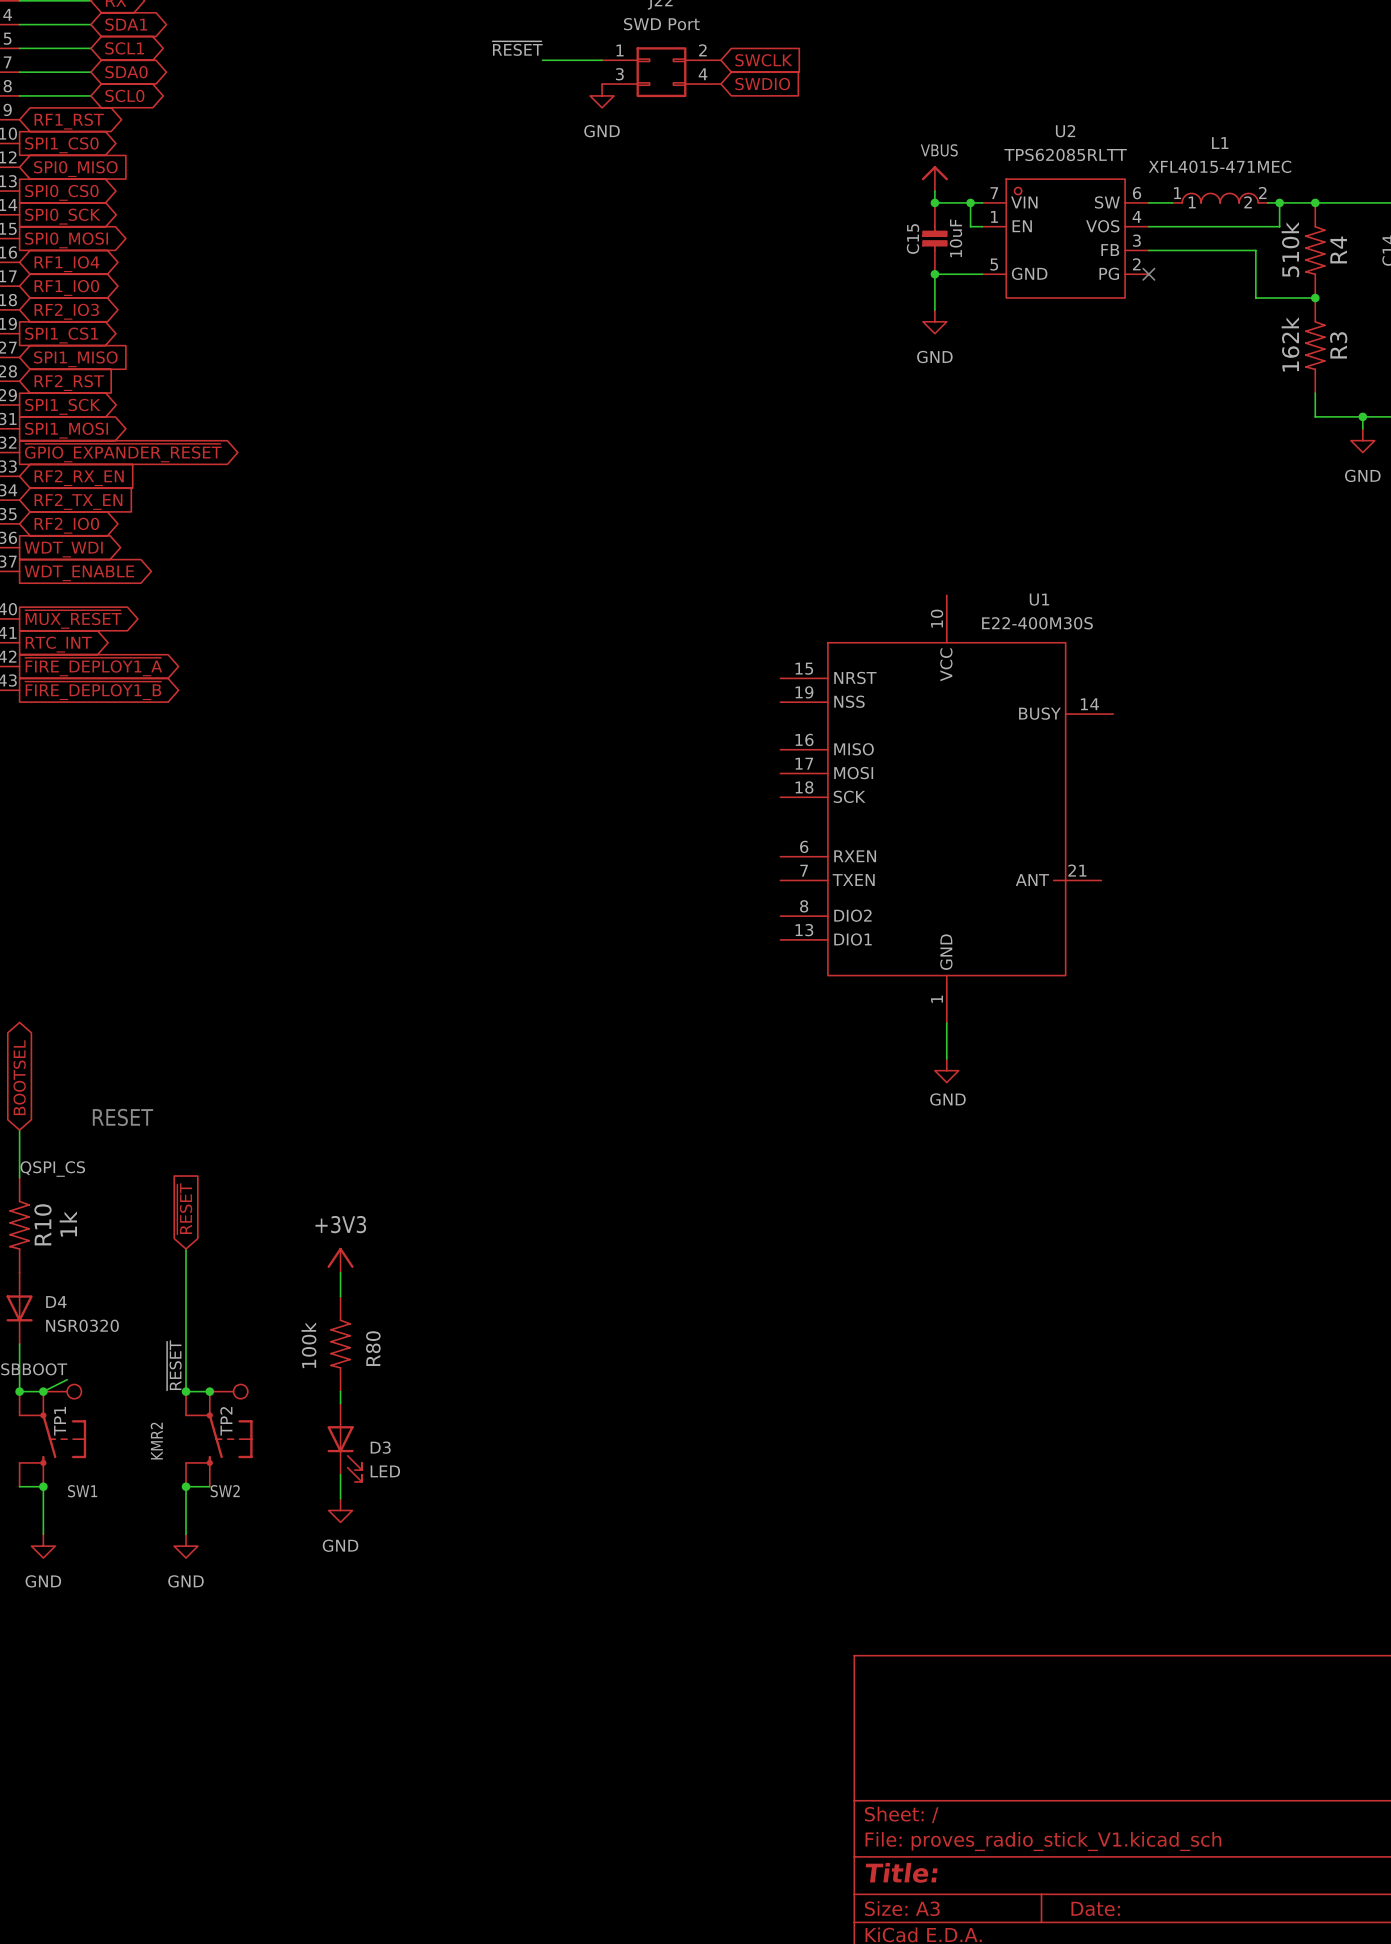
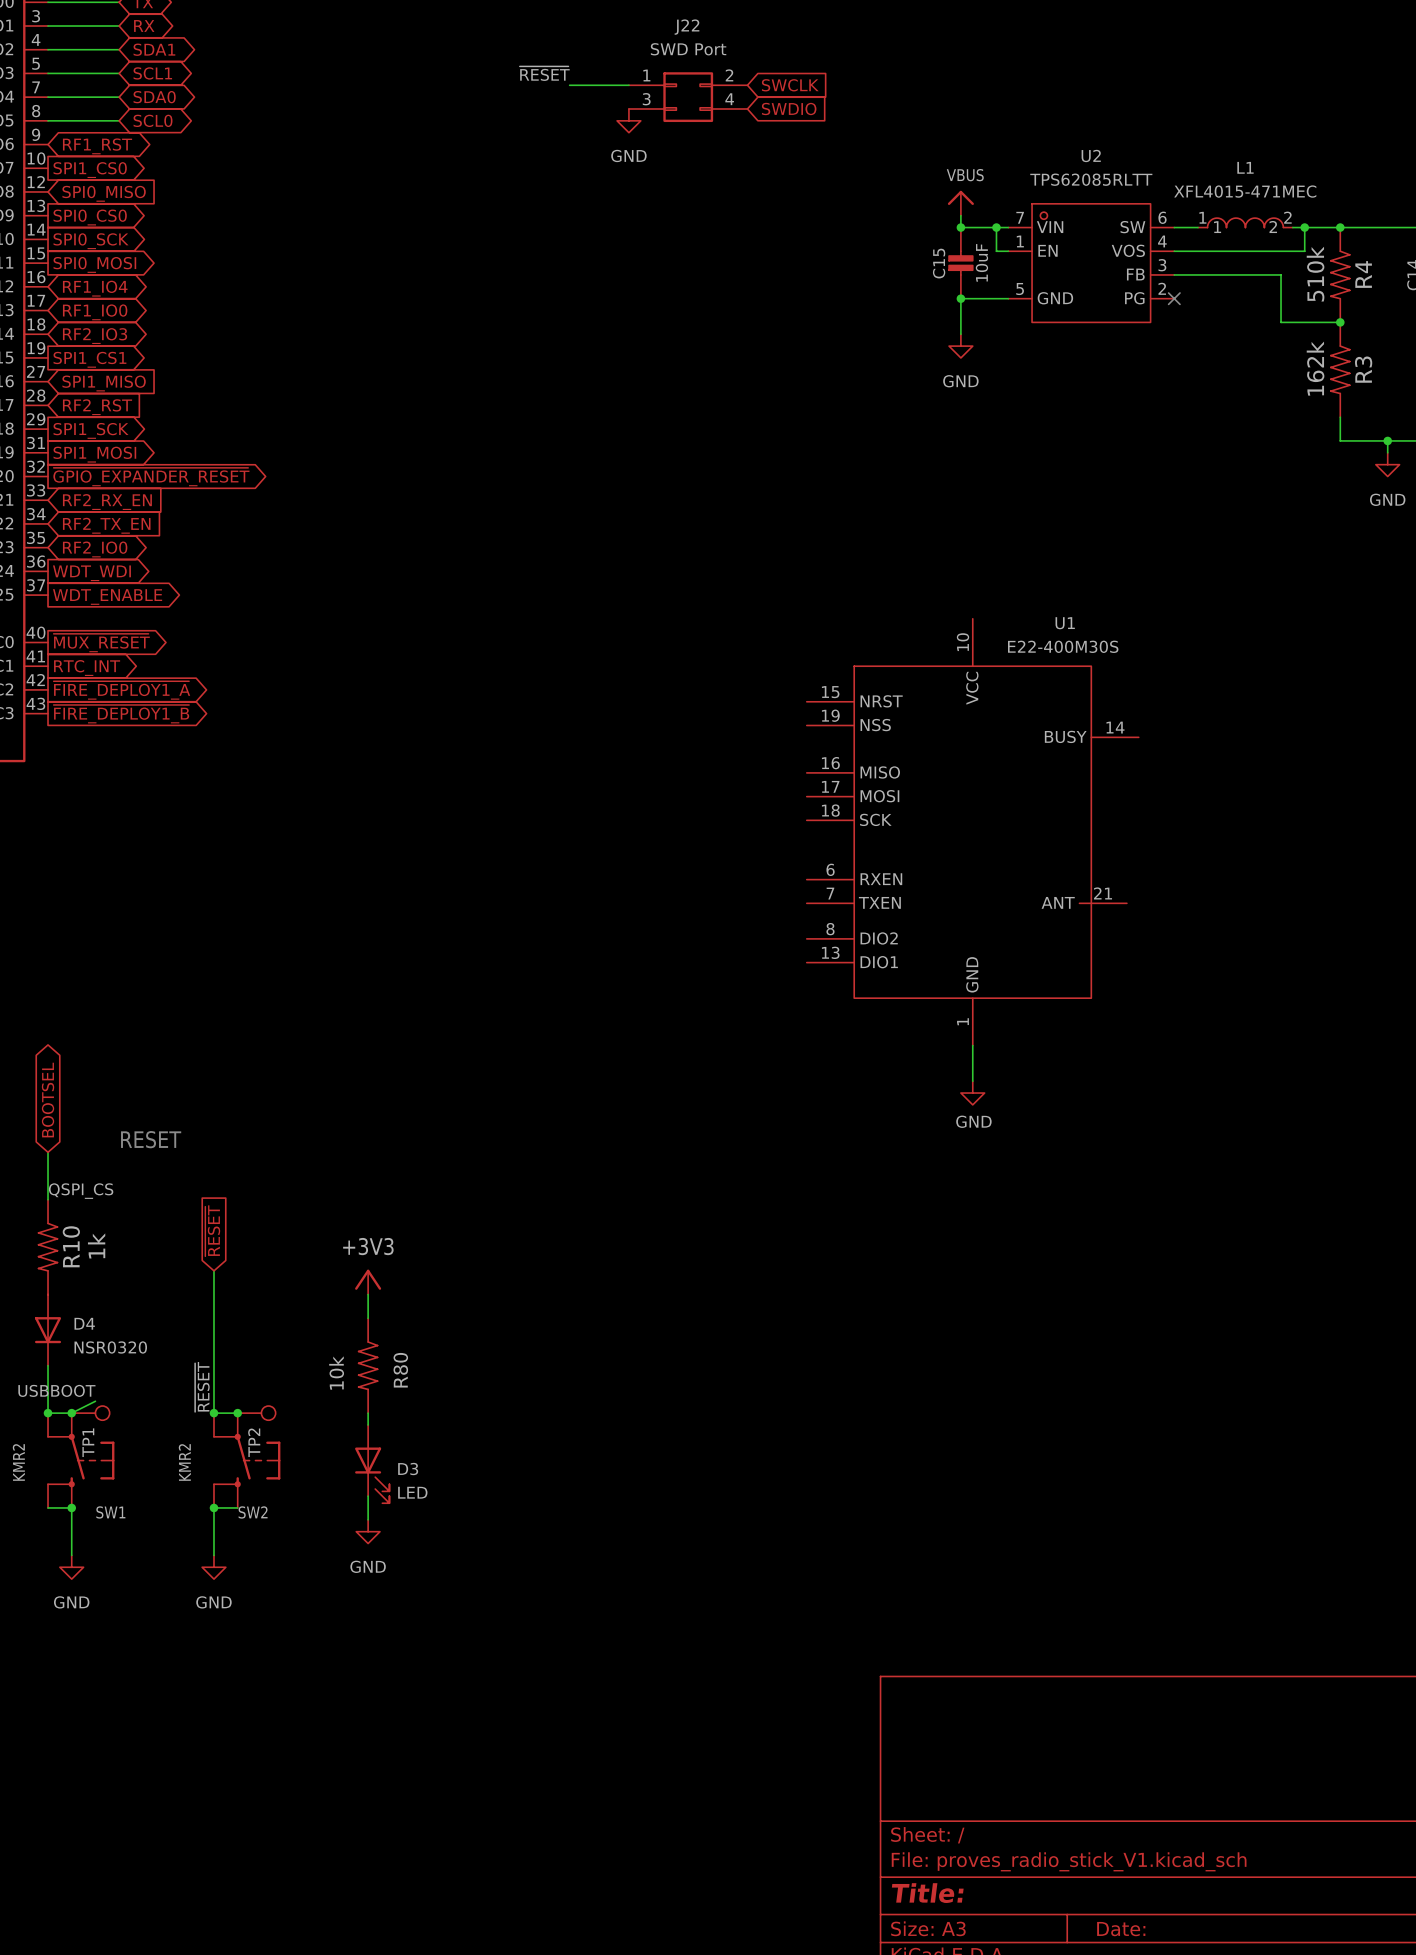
R80 value: 100k (308, 1345) -> 10k (336, 1373)

